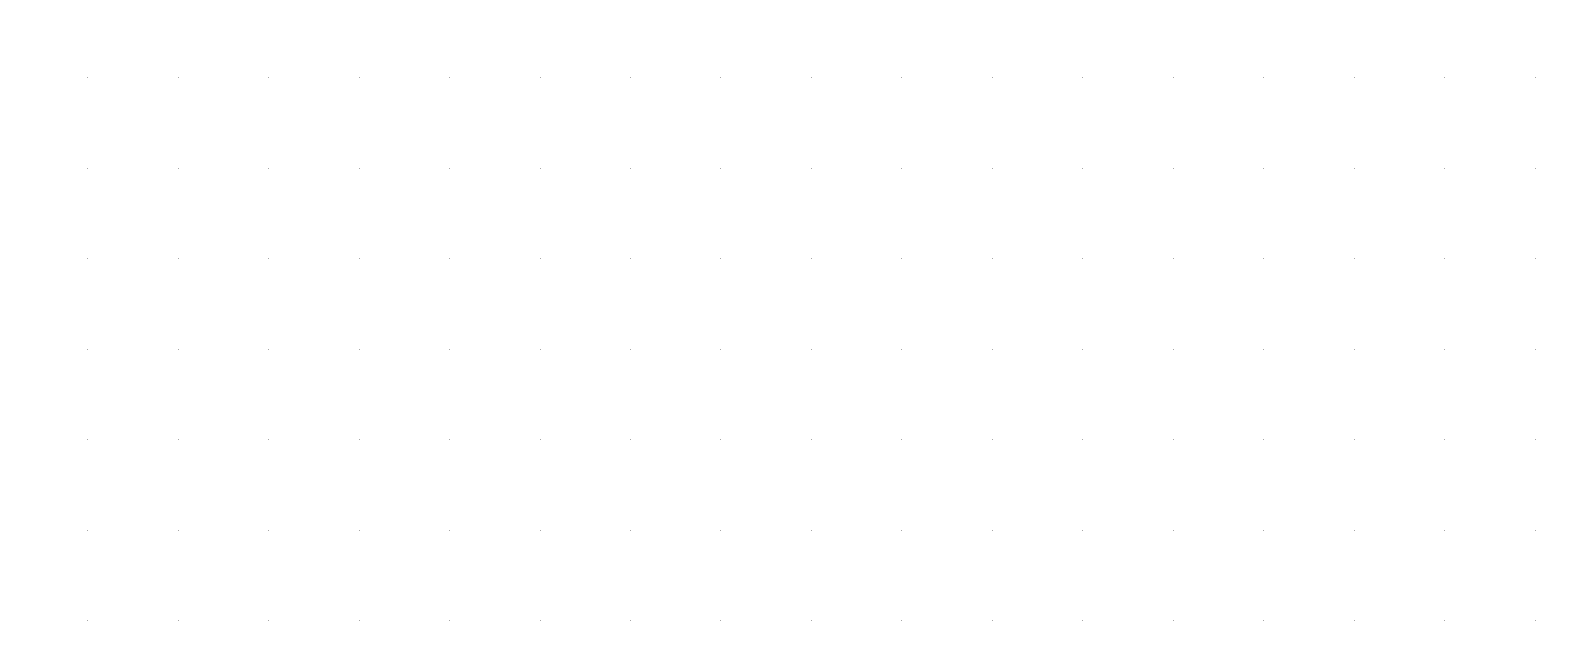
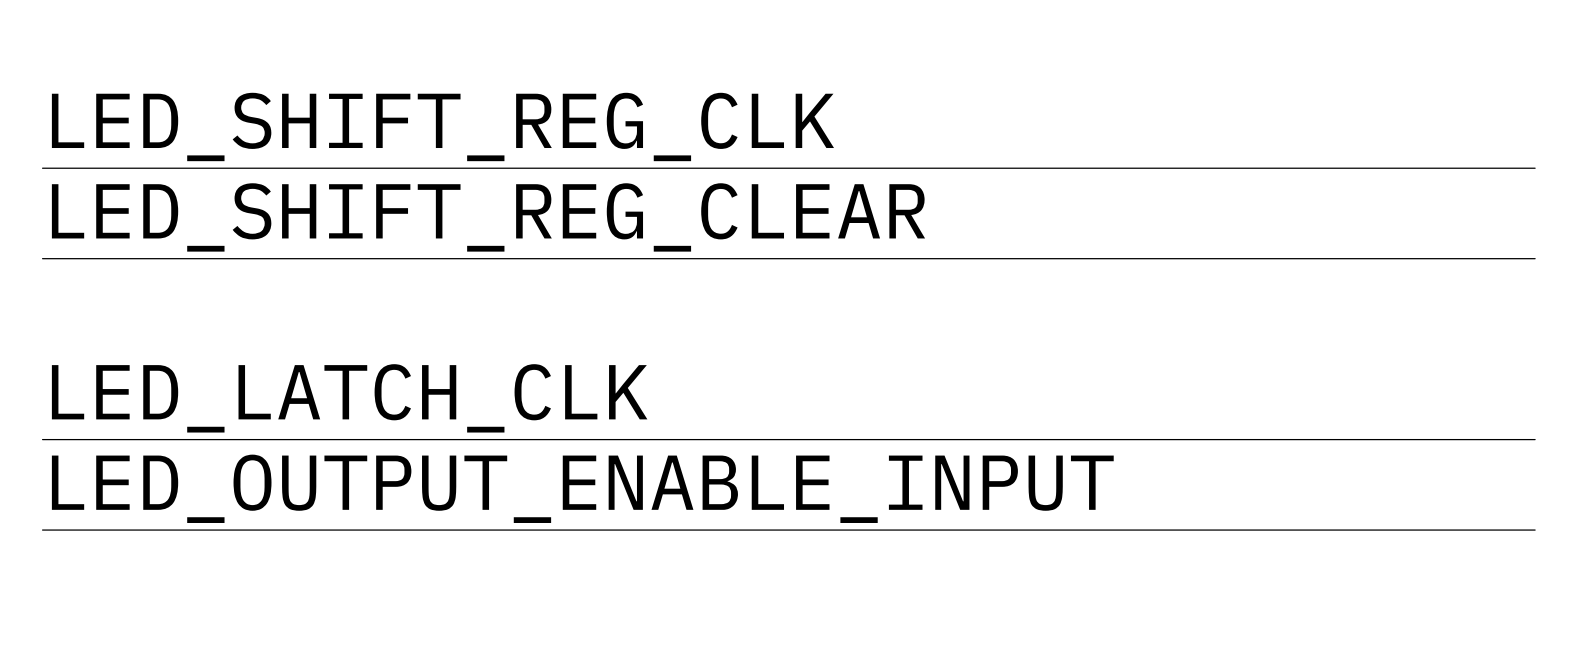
label: none -> LED_SHIFT_REG_CLK (442, 126)
wire: none -> (42, 168) (1535, 168)
label: none -> LED_SHIFT_REG_CLEAR (488, 217)
wire: none -> (42, 258) (1535, 258)
label: none -> LED_LATCH_CLK (349, 398)
wire: none -> (42, 439) (1535, 439)
label: none -> LED_OUTPUT_ENABLE_INPUT (582, 488)
wire: none -> (42, 530) (1535, 530)

